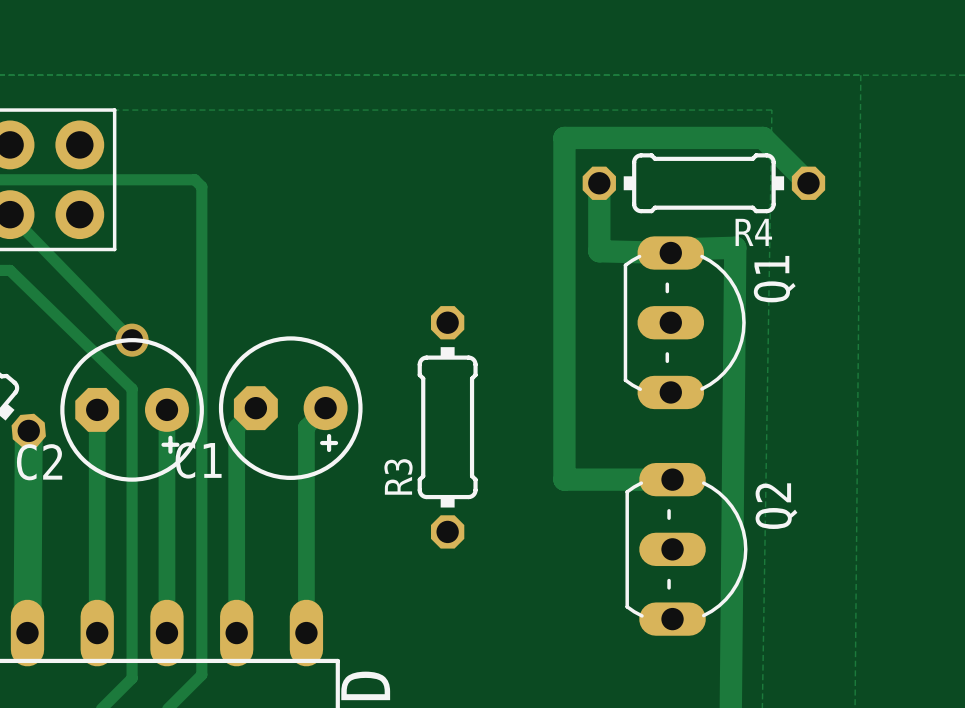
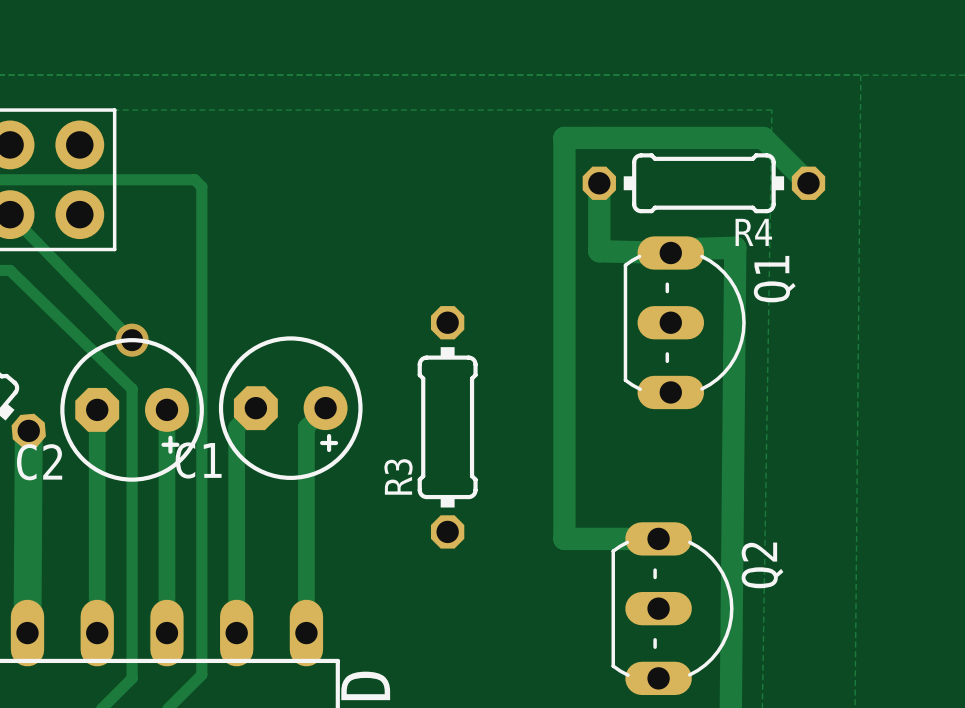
track: (564, 479) (672, 479) -> (564, 479) (564, 538) (658, 538)
Q2 position: (686, 549) -> (672, 608)

